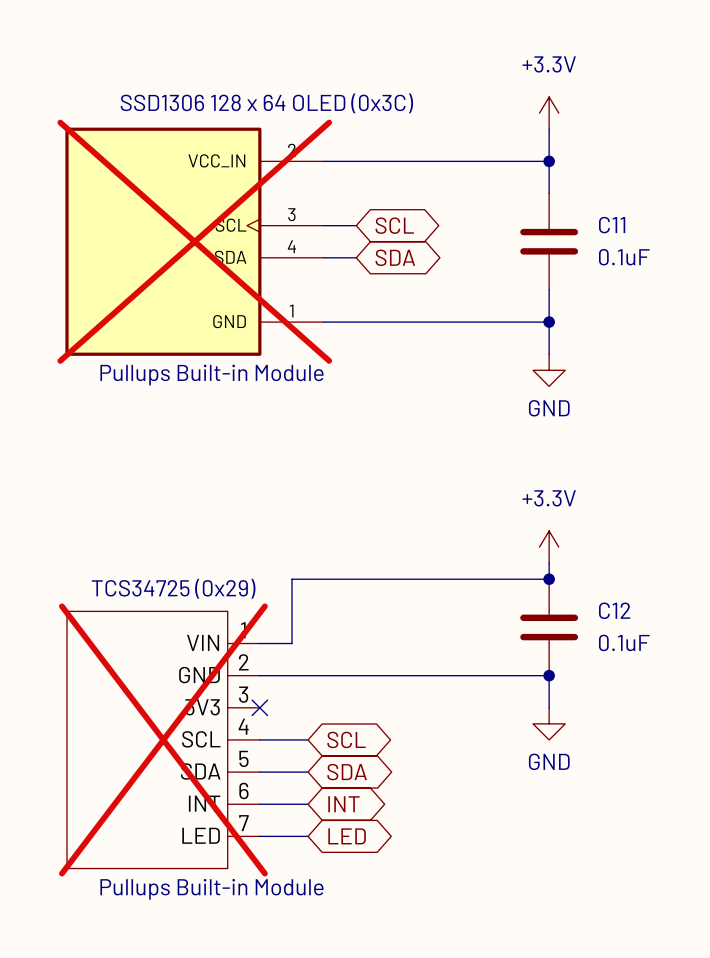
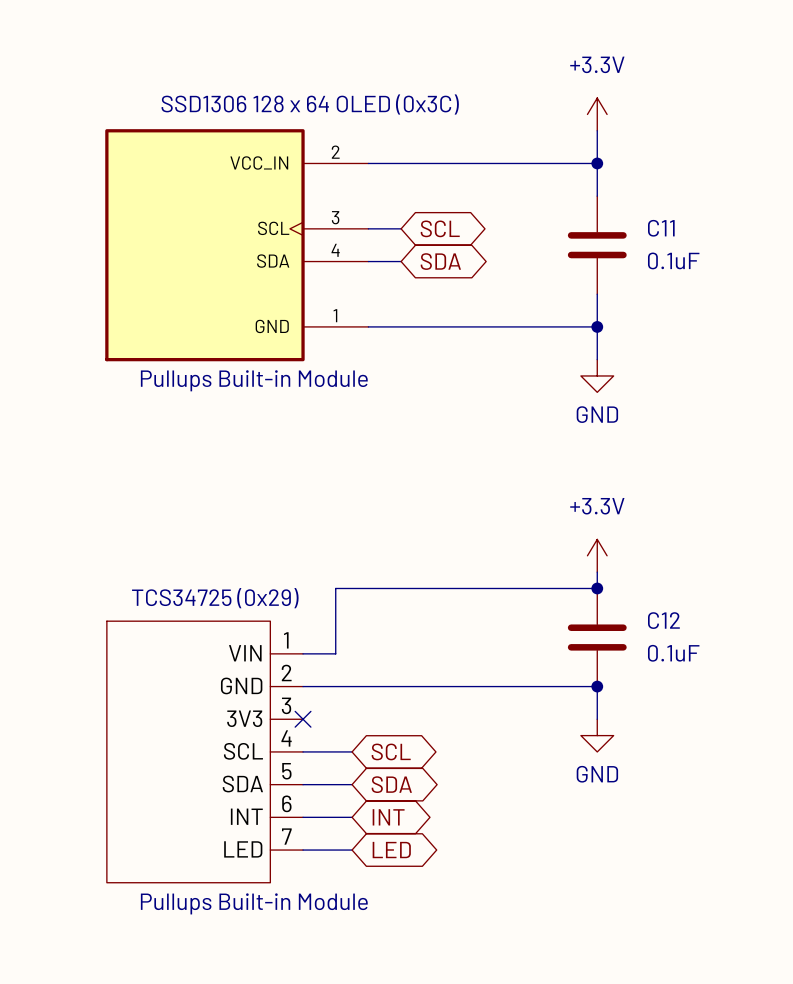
part do-not-place cross: (194, 241) -> none
part do-not-place cross: (163, 739) -> none

